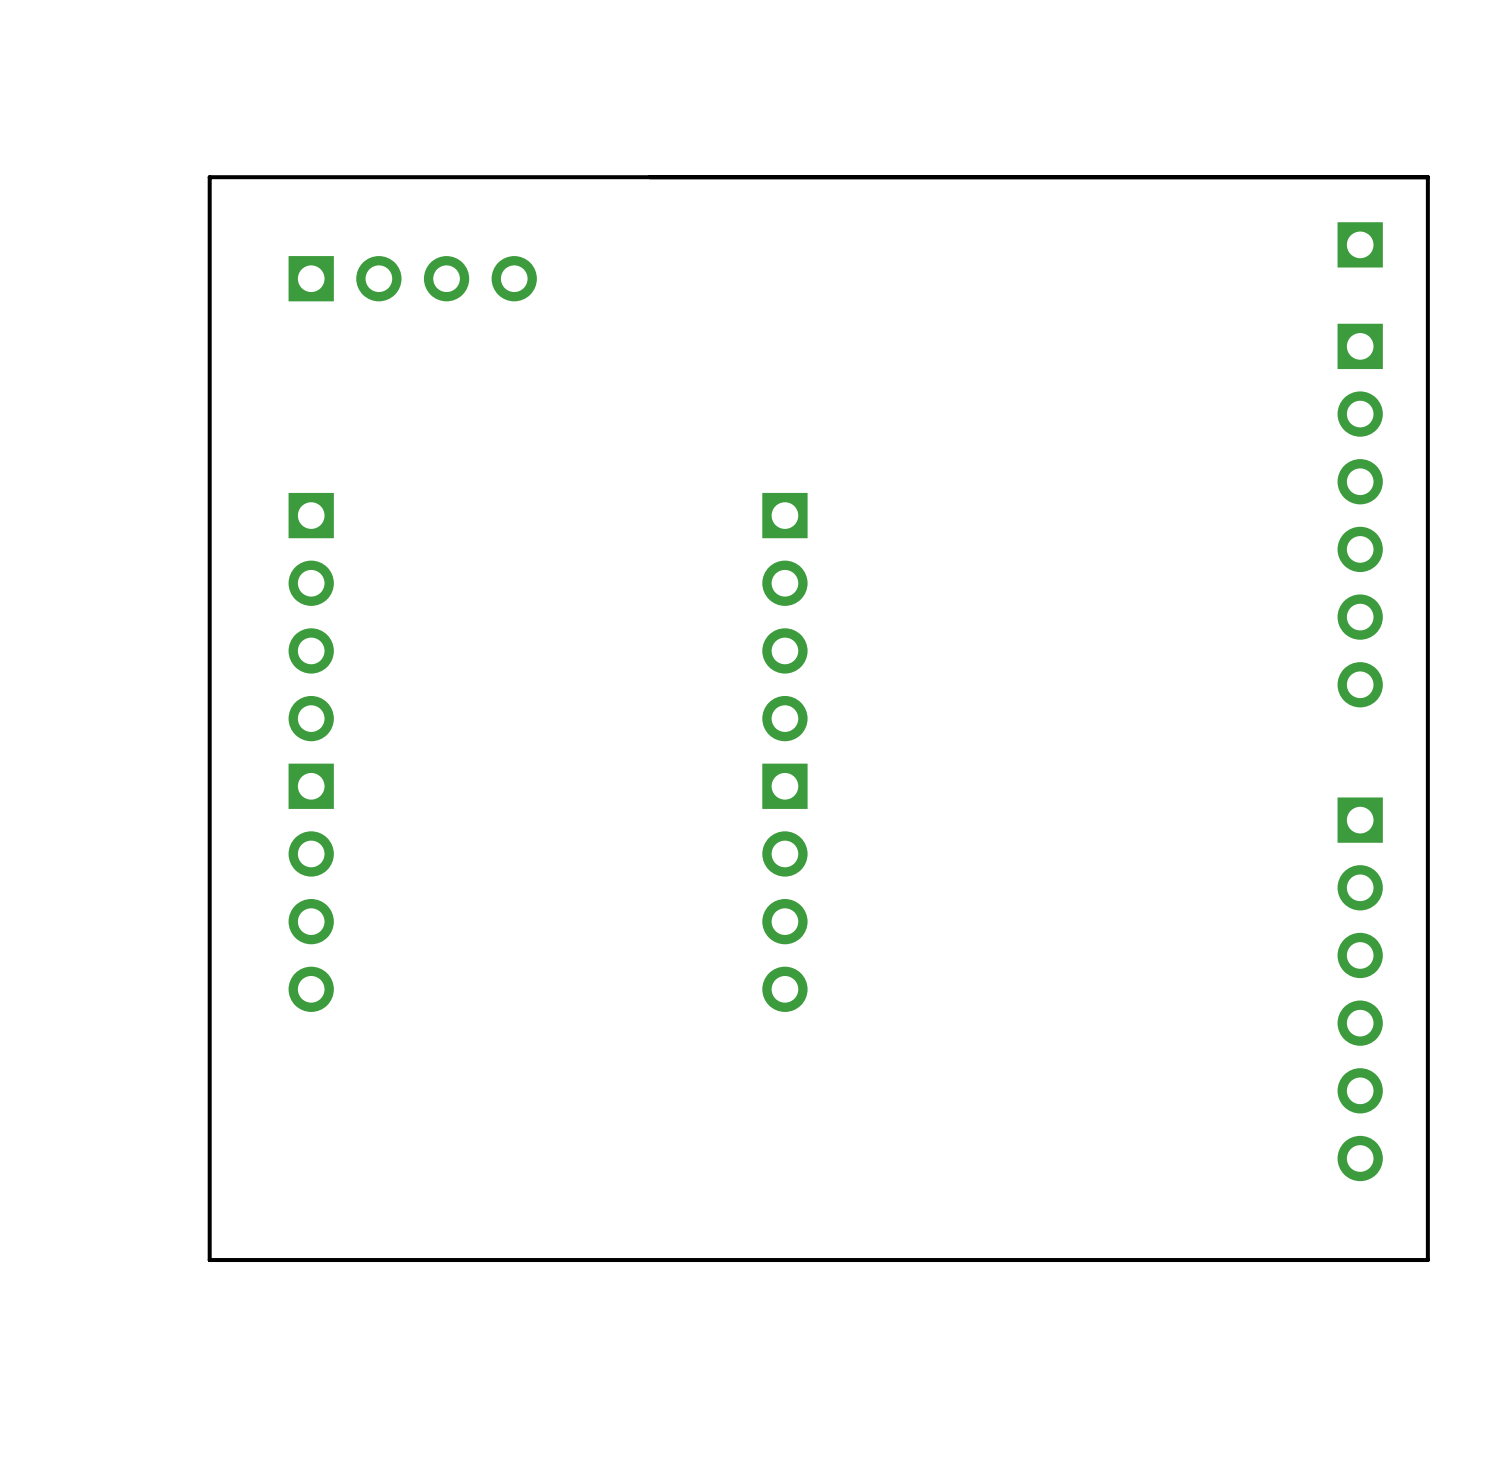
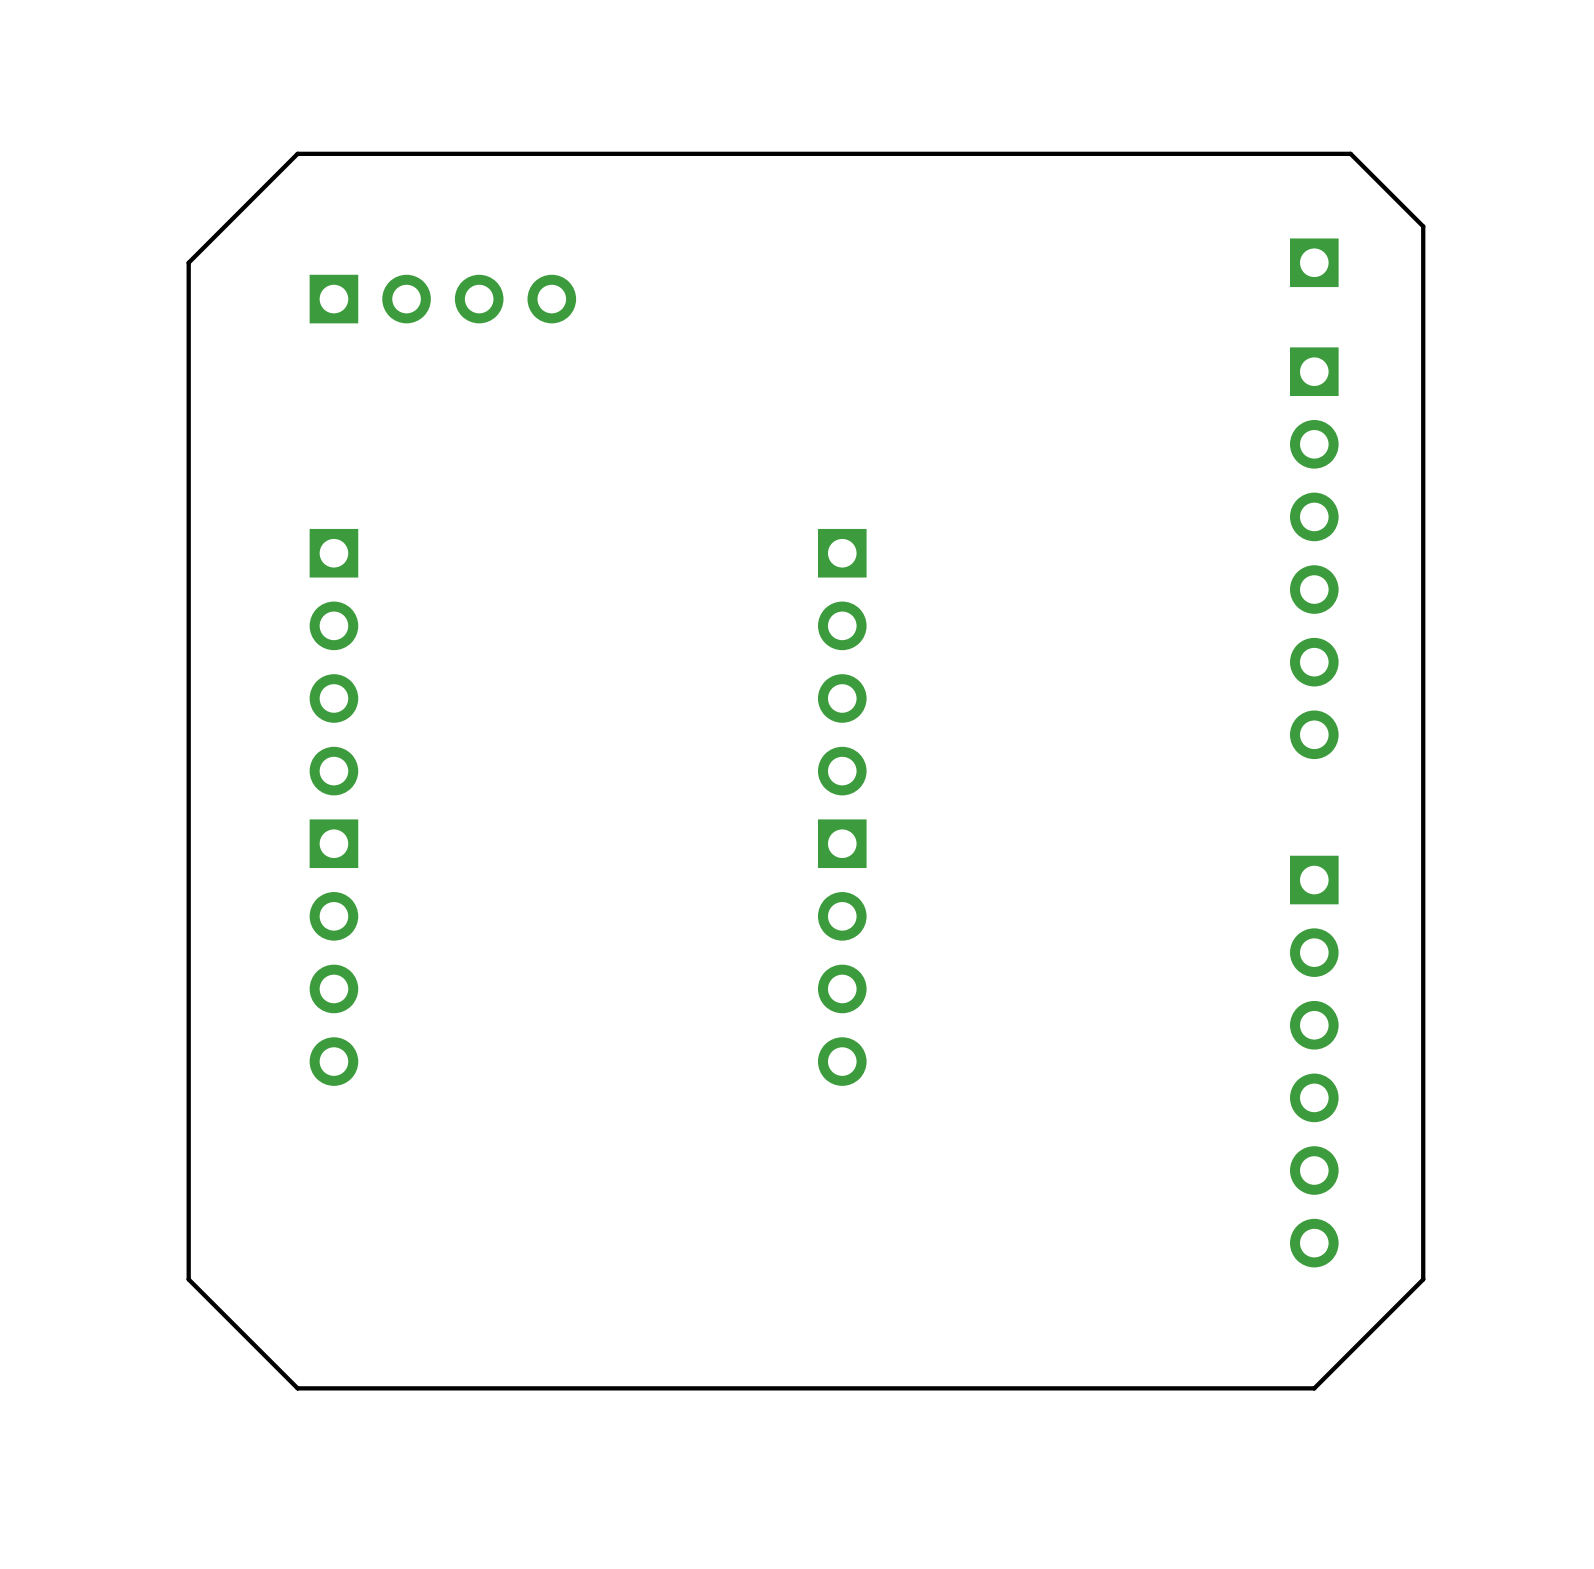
board edge: (1427, 177) (1427, 1260) (209, 1260) (209, 177) (1427, 177) -> (1350, 153) (1423, 226) (1423, 1279) (1314, 1388) (297, 1388) (188, 1279) (188, 262) (297, 153) (1350, 153)
part position: (1360, 244) -> (1314, 262)
part position: (1360, 515) -> (1314, 553)
part position: (1360, 989) -> (1314, 1061)

